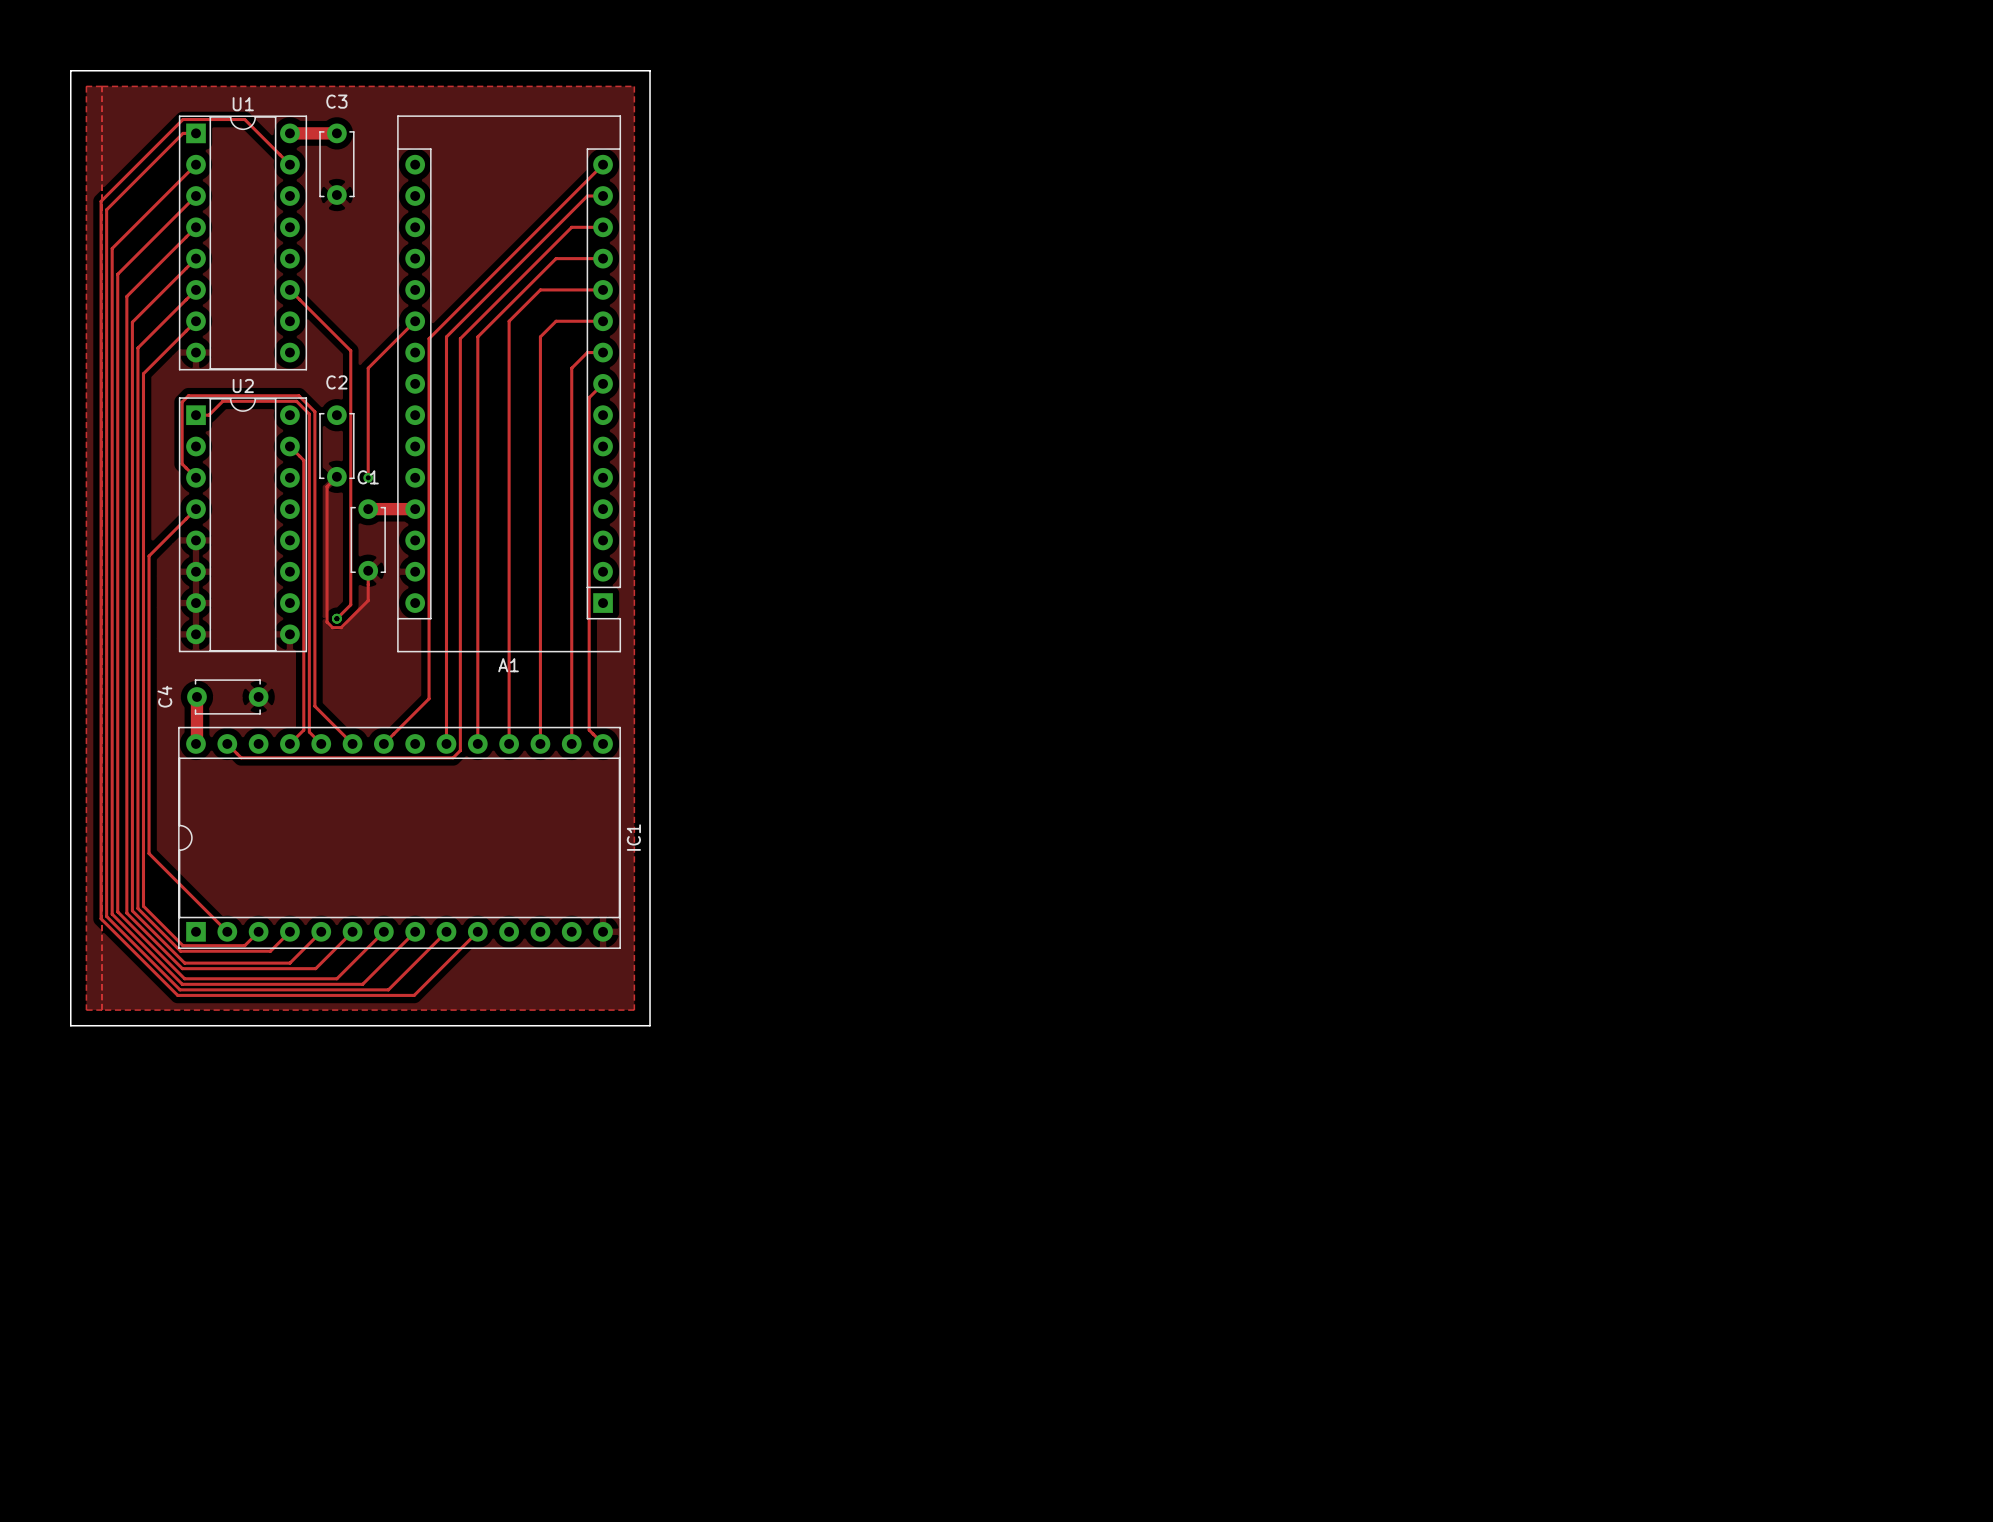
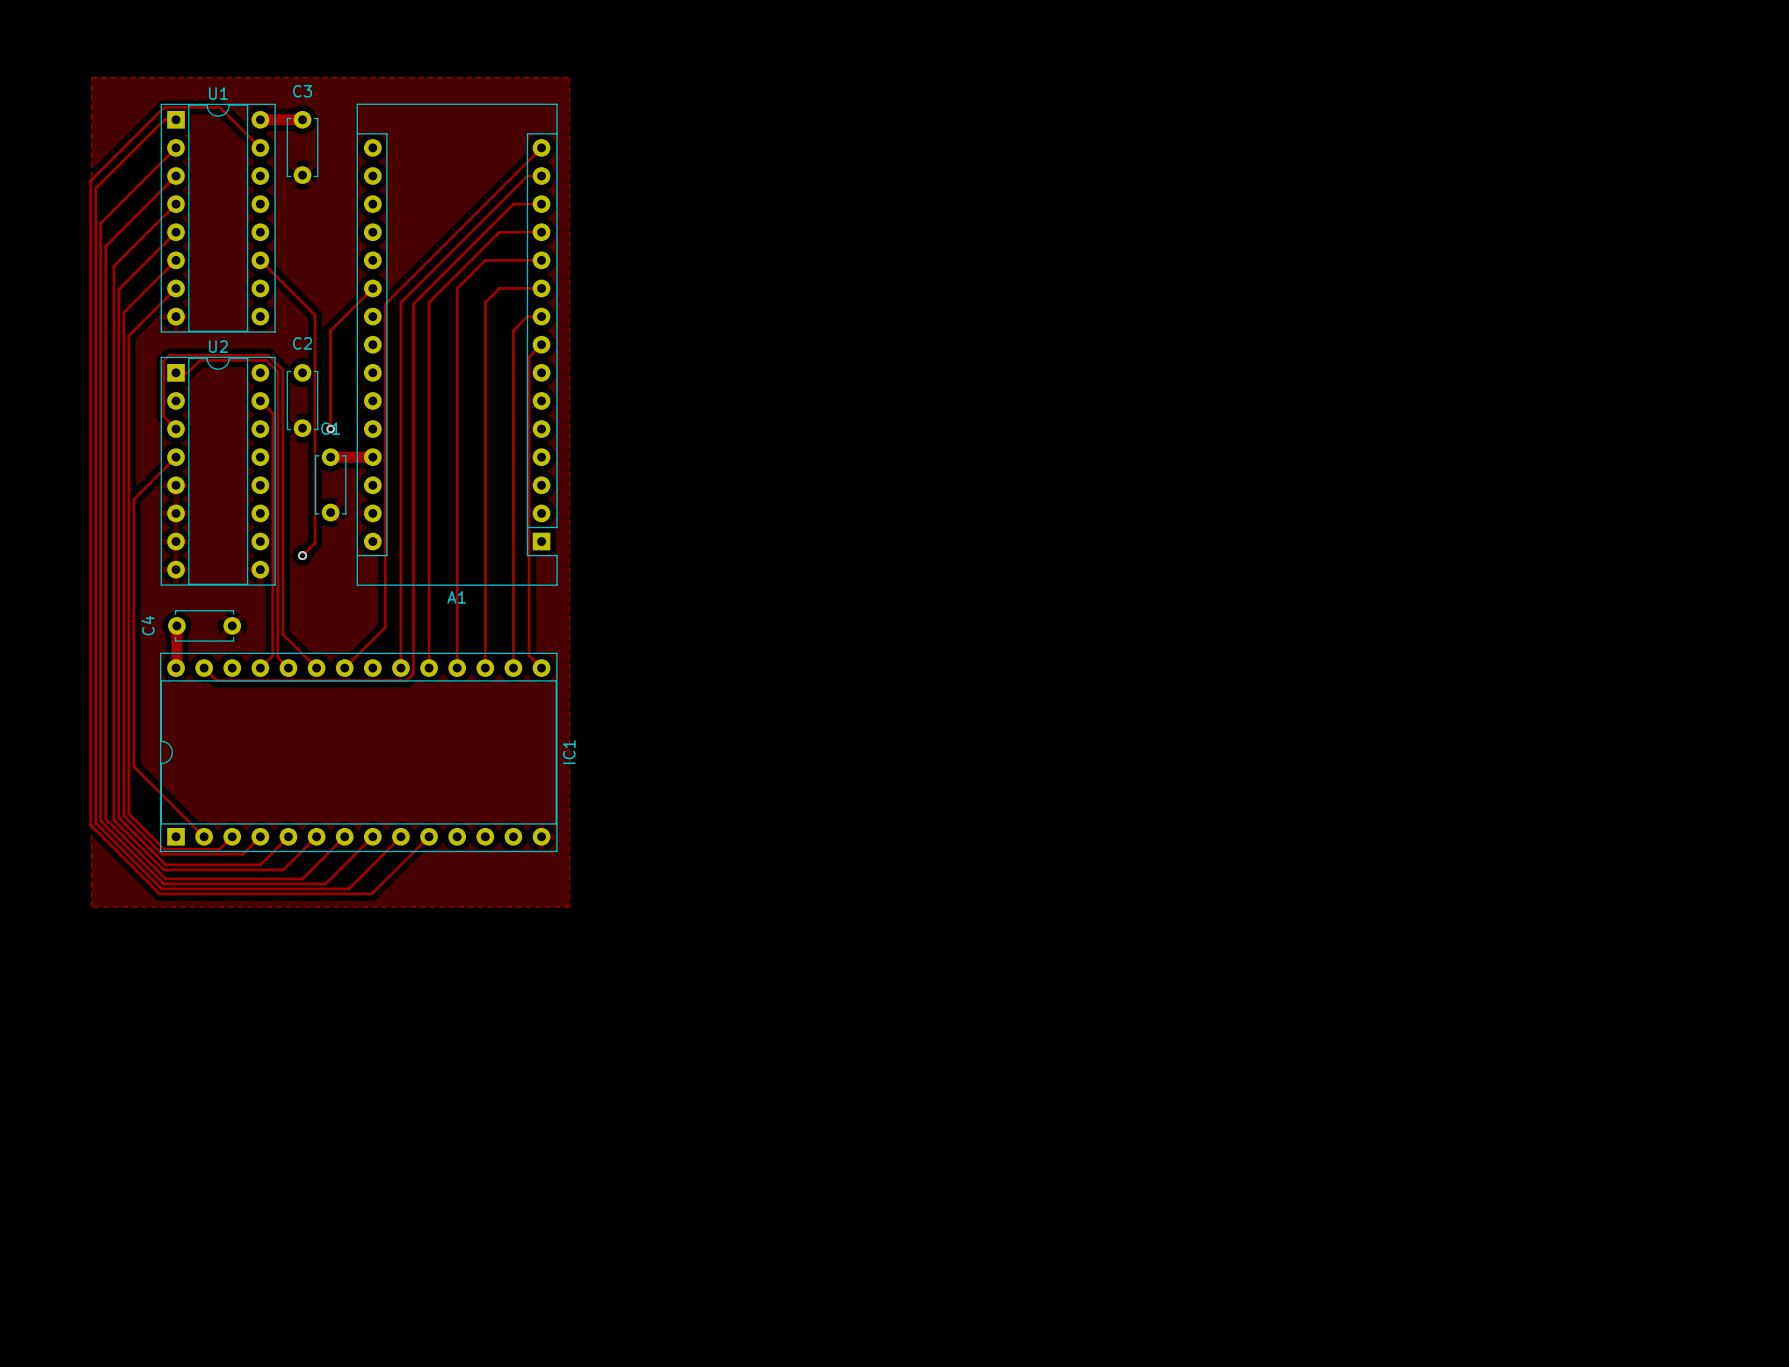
board edge: (70, 70) (70, 1025) (650, 1025) (650, 70) (70, 70) -> none
zone outline: (102, 86) (86, 86) (86, 1010) (102, 1010) -> none
track: (336, 476) (327, 486) (327, 622) (332, 627) (341, 627) (368, 600) (368, 570) -> none

